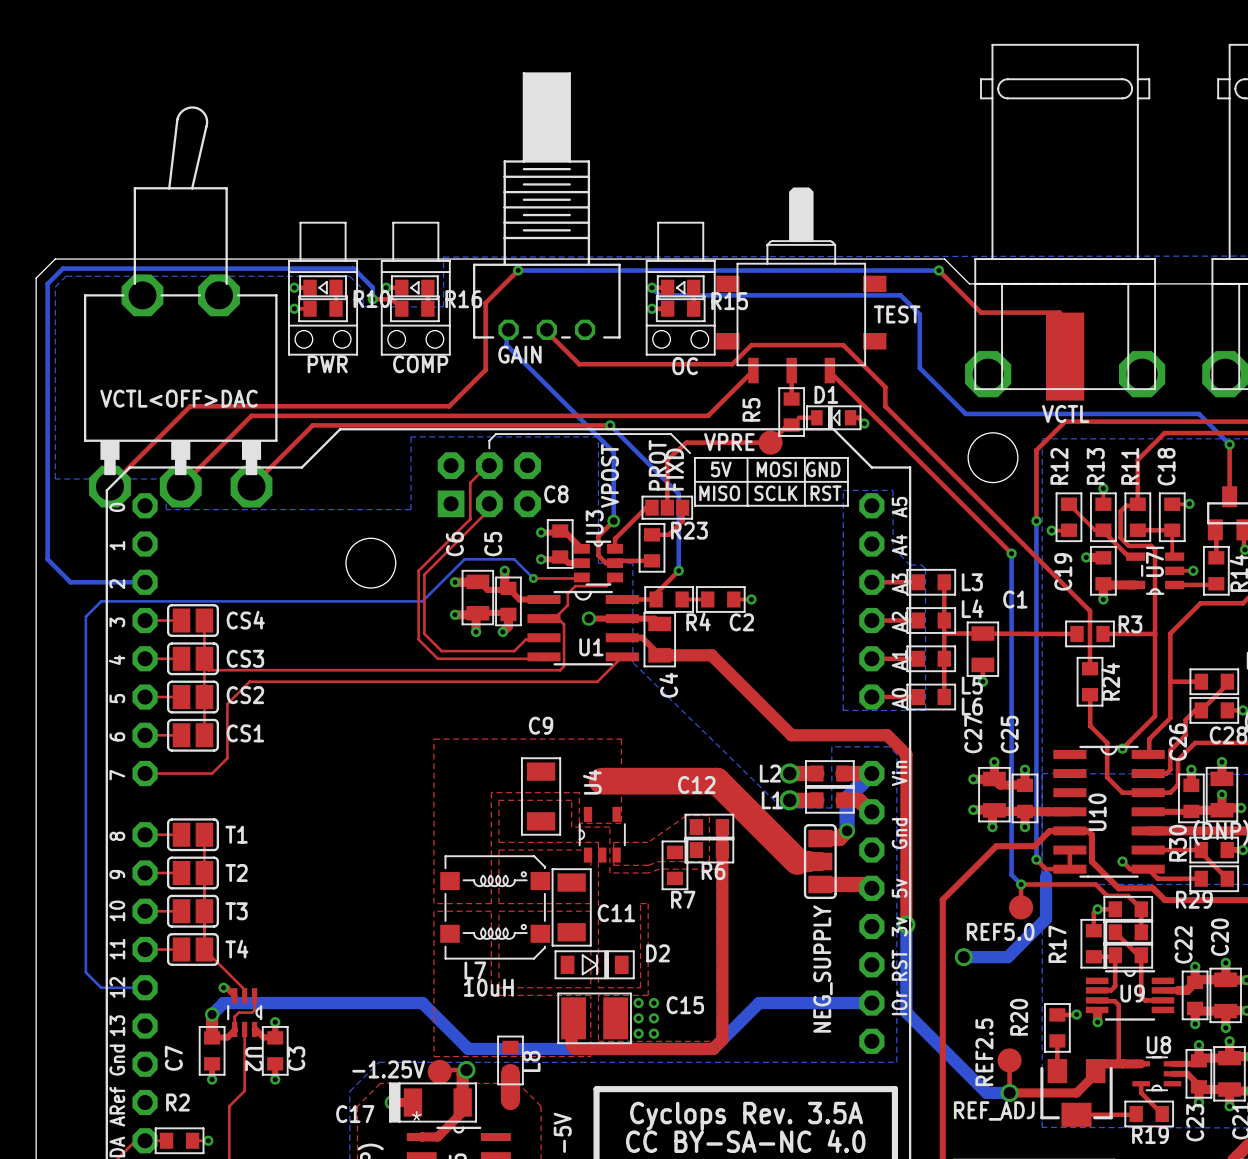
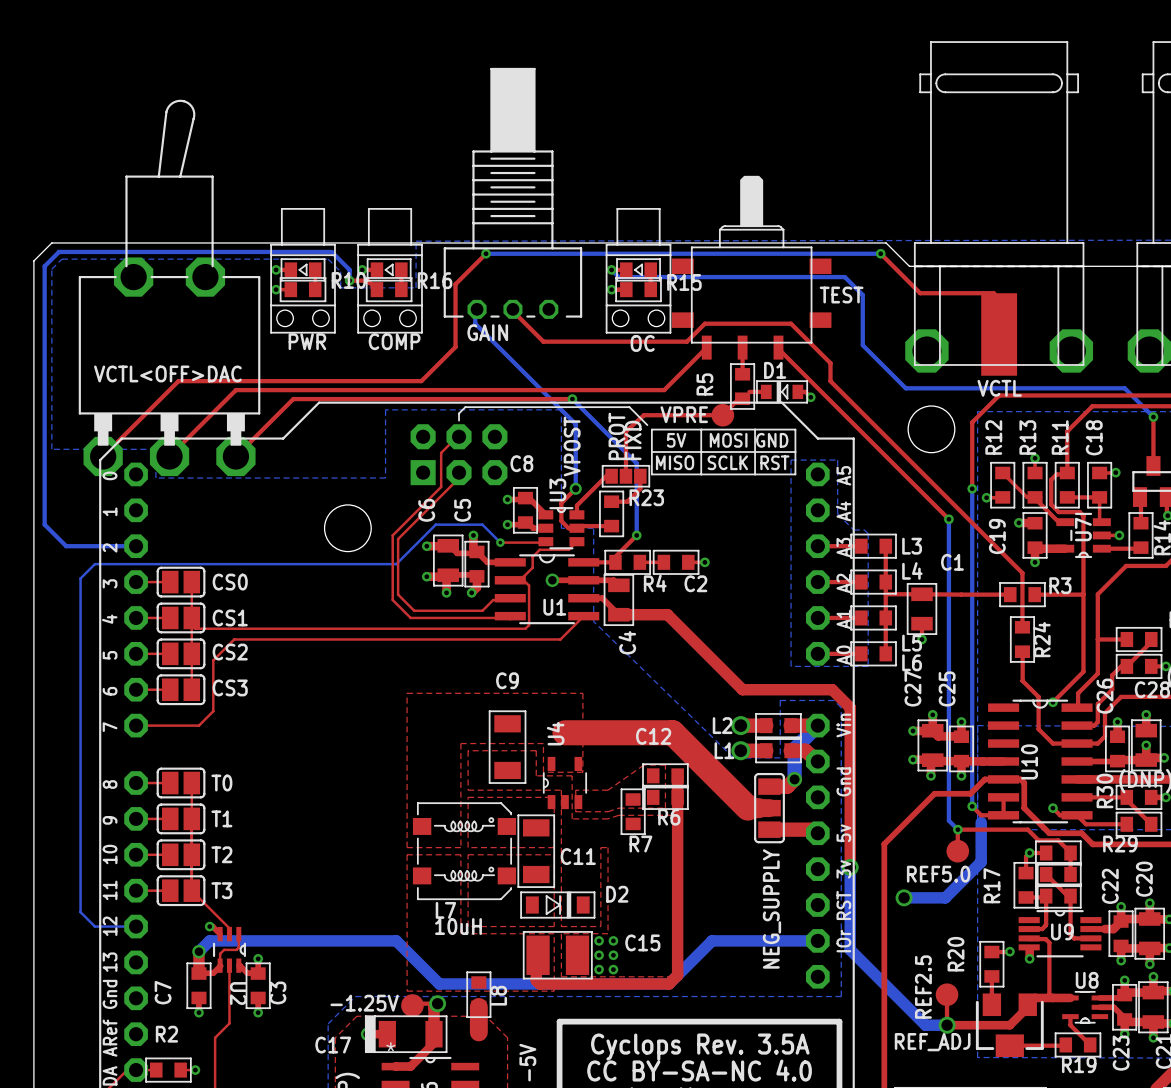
CS4 name: CS4 (245, 620) -> CS0 (230, 582)
CS3 name: CS3 (245, 658) -> CS1 (230, 617)
CS1 name: CS1 (245, 733) -> CS3 (230, 687)
T1 name: T1 (236, 834) -> T0 (221, 783)
T2 name: T2 (236, 872) -> T1 (221, 818)
T3 name: T3 (236, 911) -> T2 (221, 854)
T4 name: T4 (236, 949) -> T3 (221, 890)

